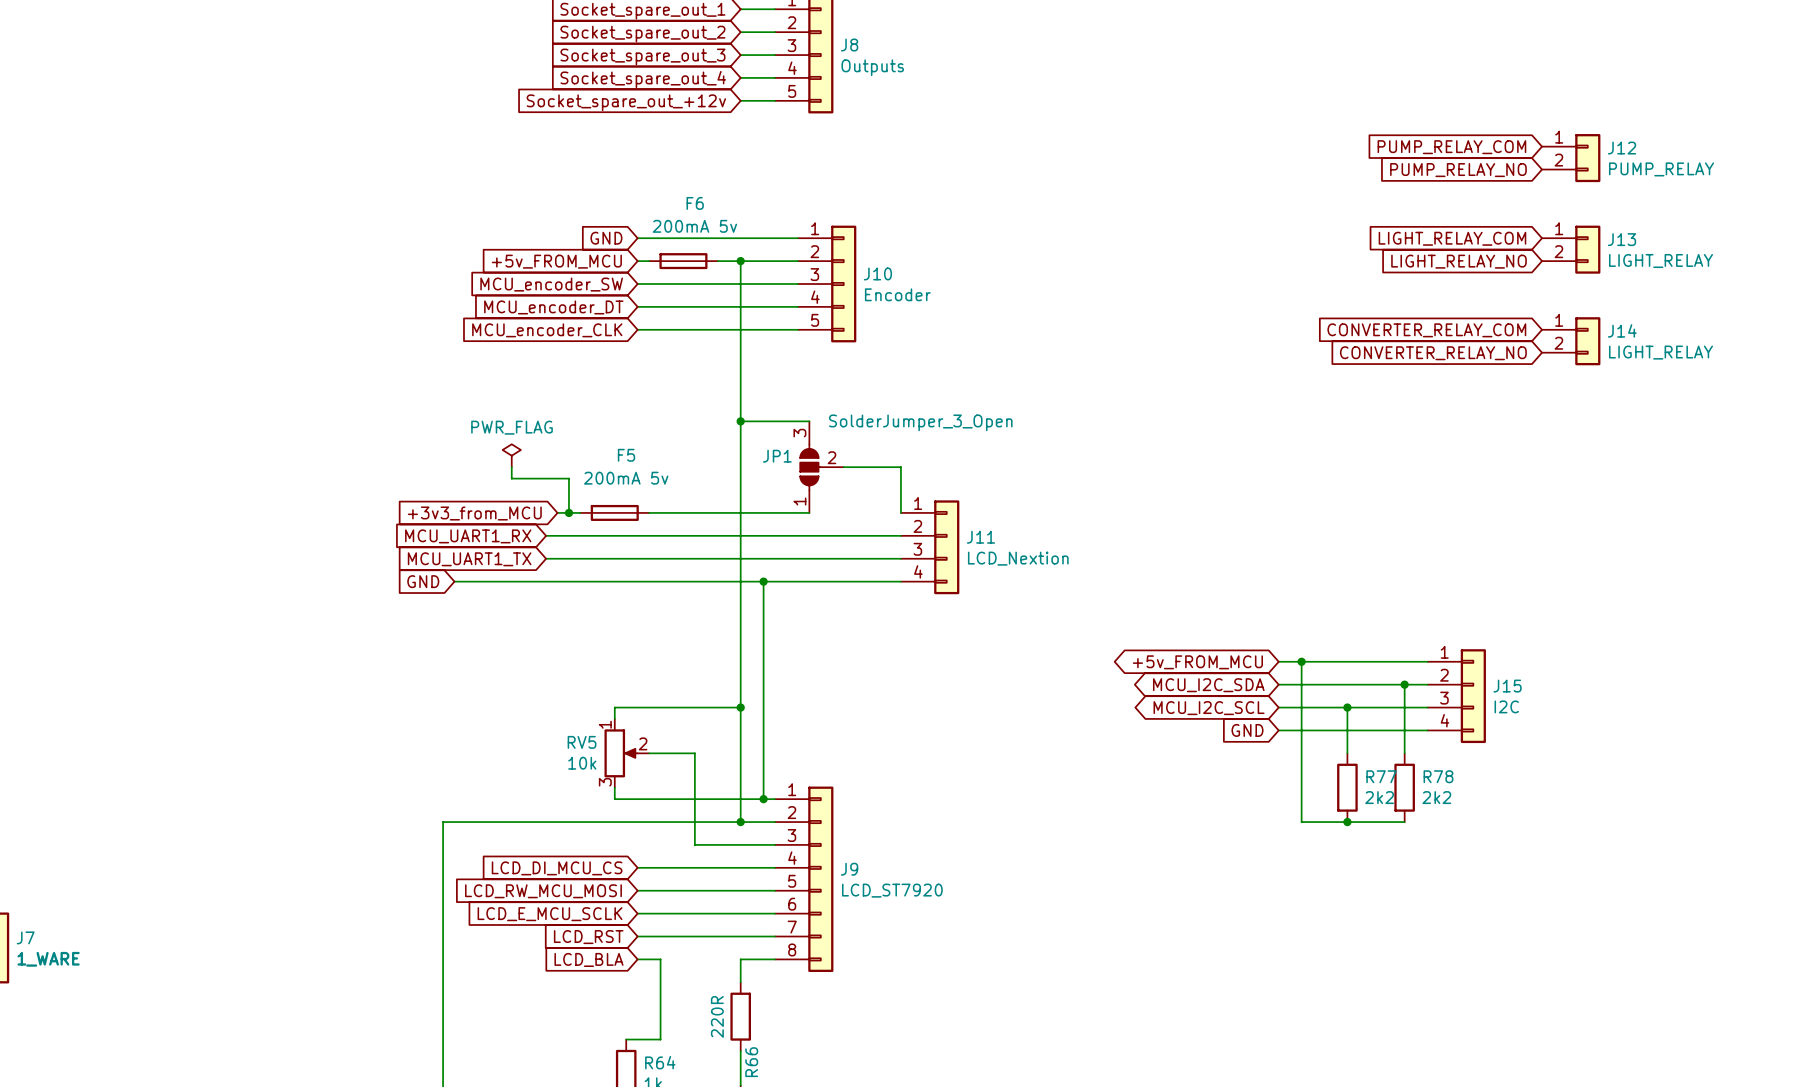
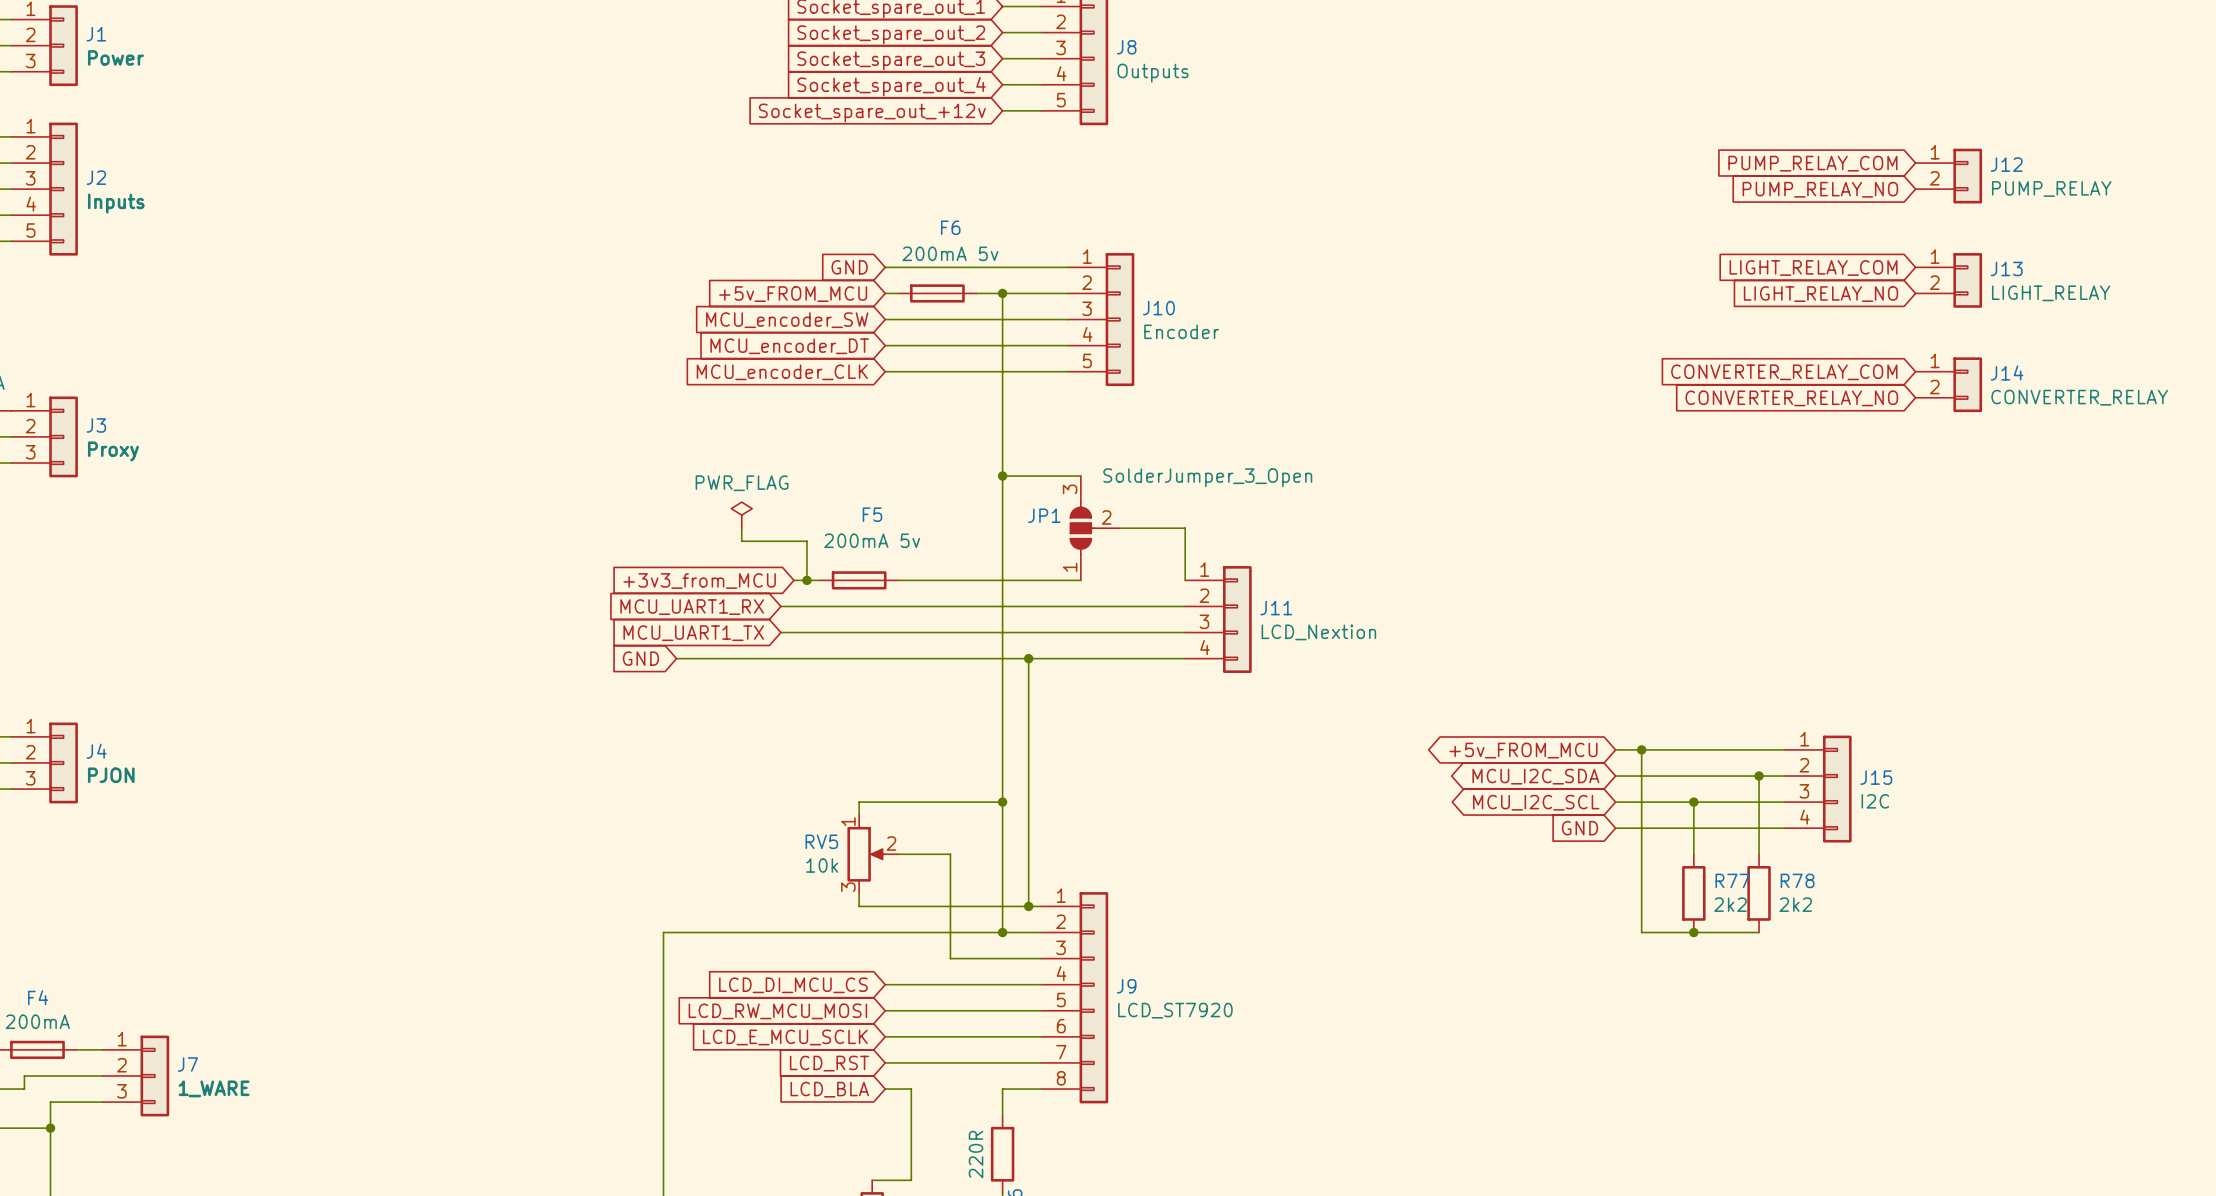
J14 value: LIGHT_RELAY (1661, 352) -> CONVERTER_RELAY (2079, 397)

